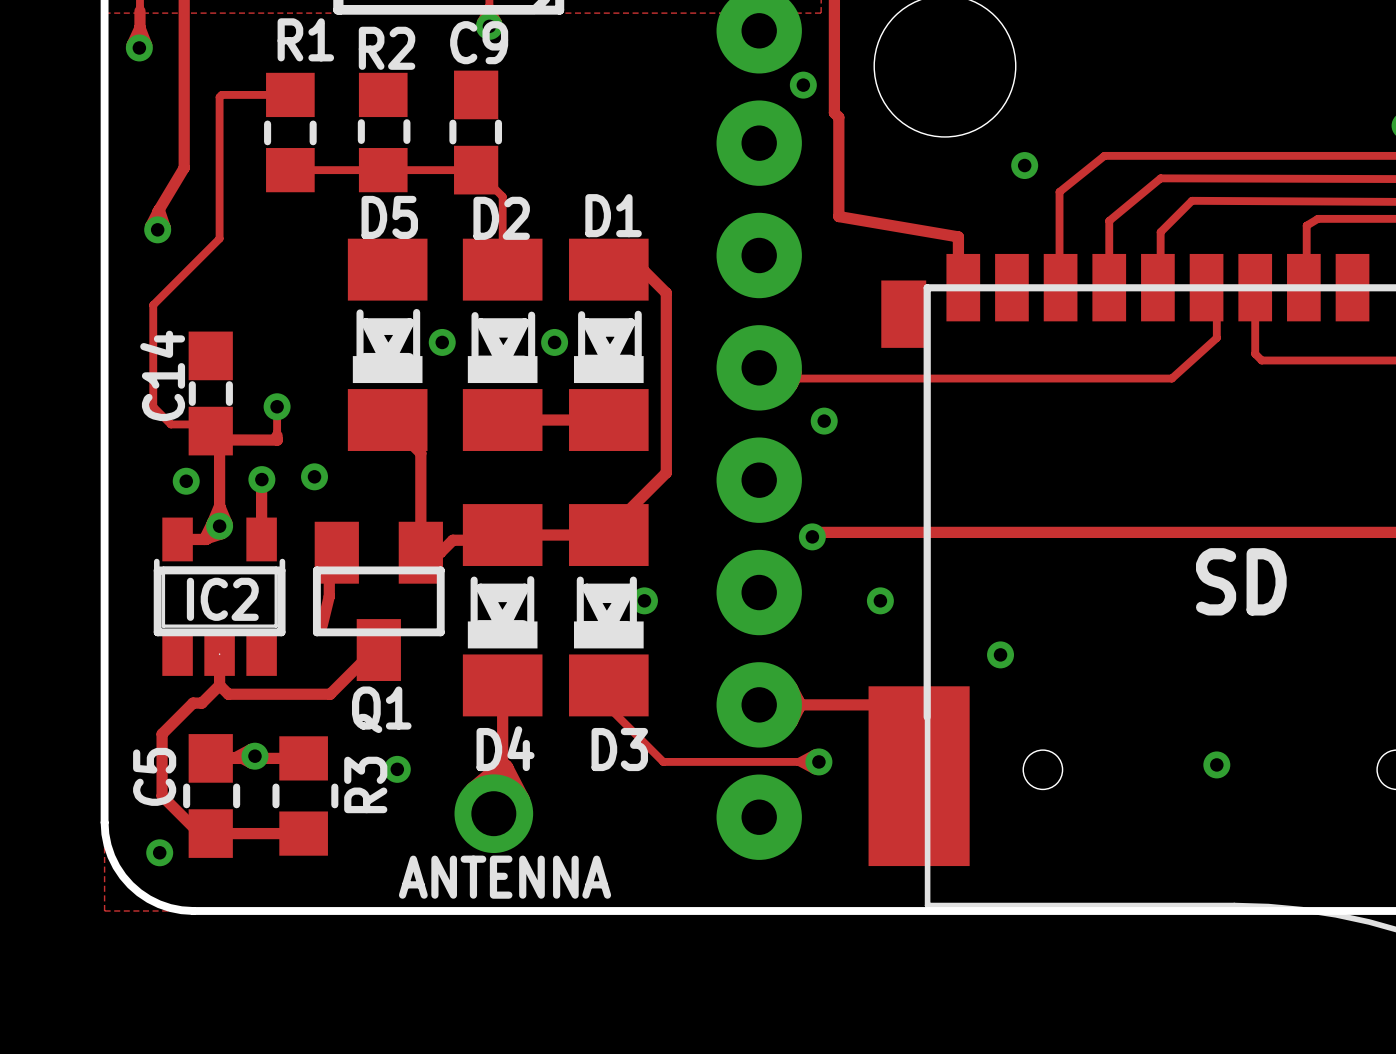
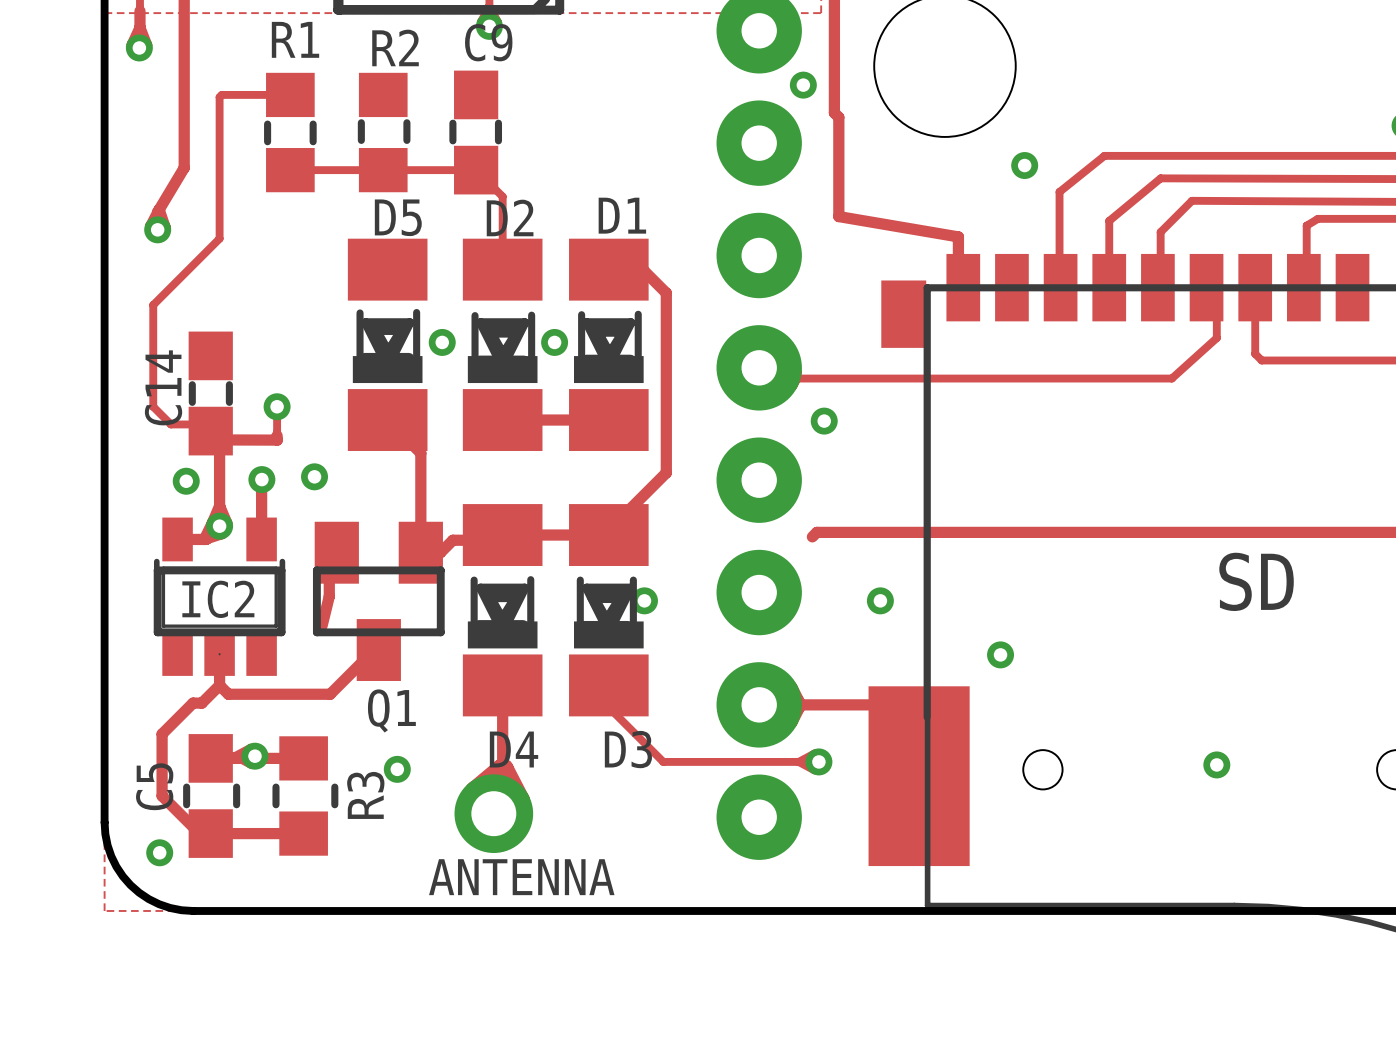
via: (812, 536) -> none

